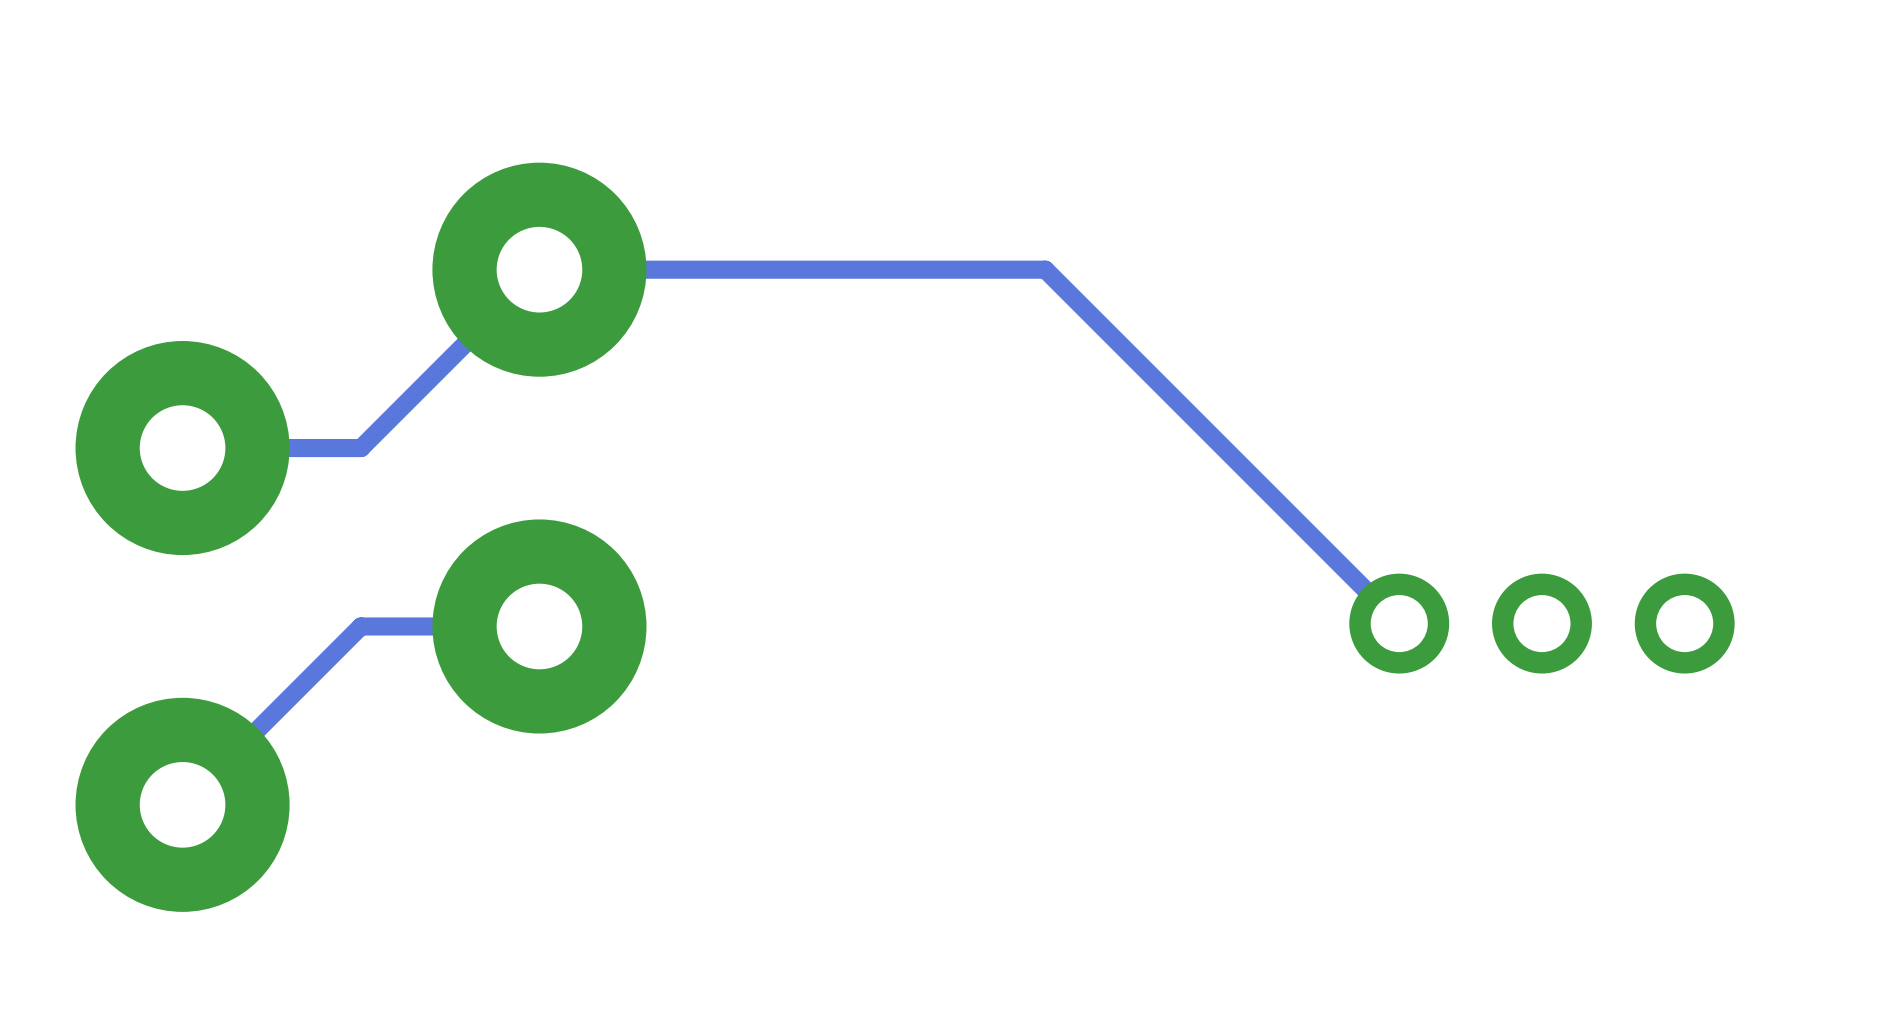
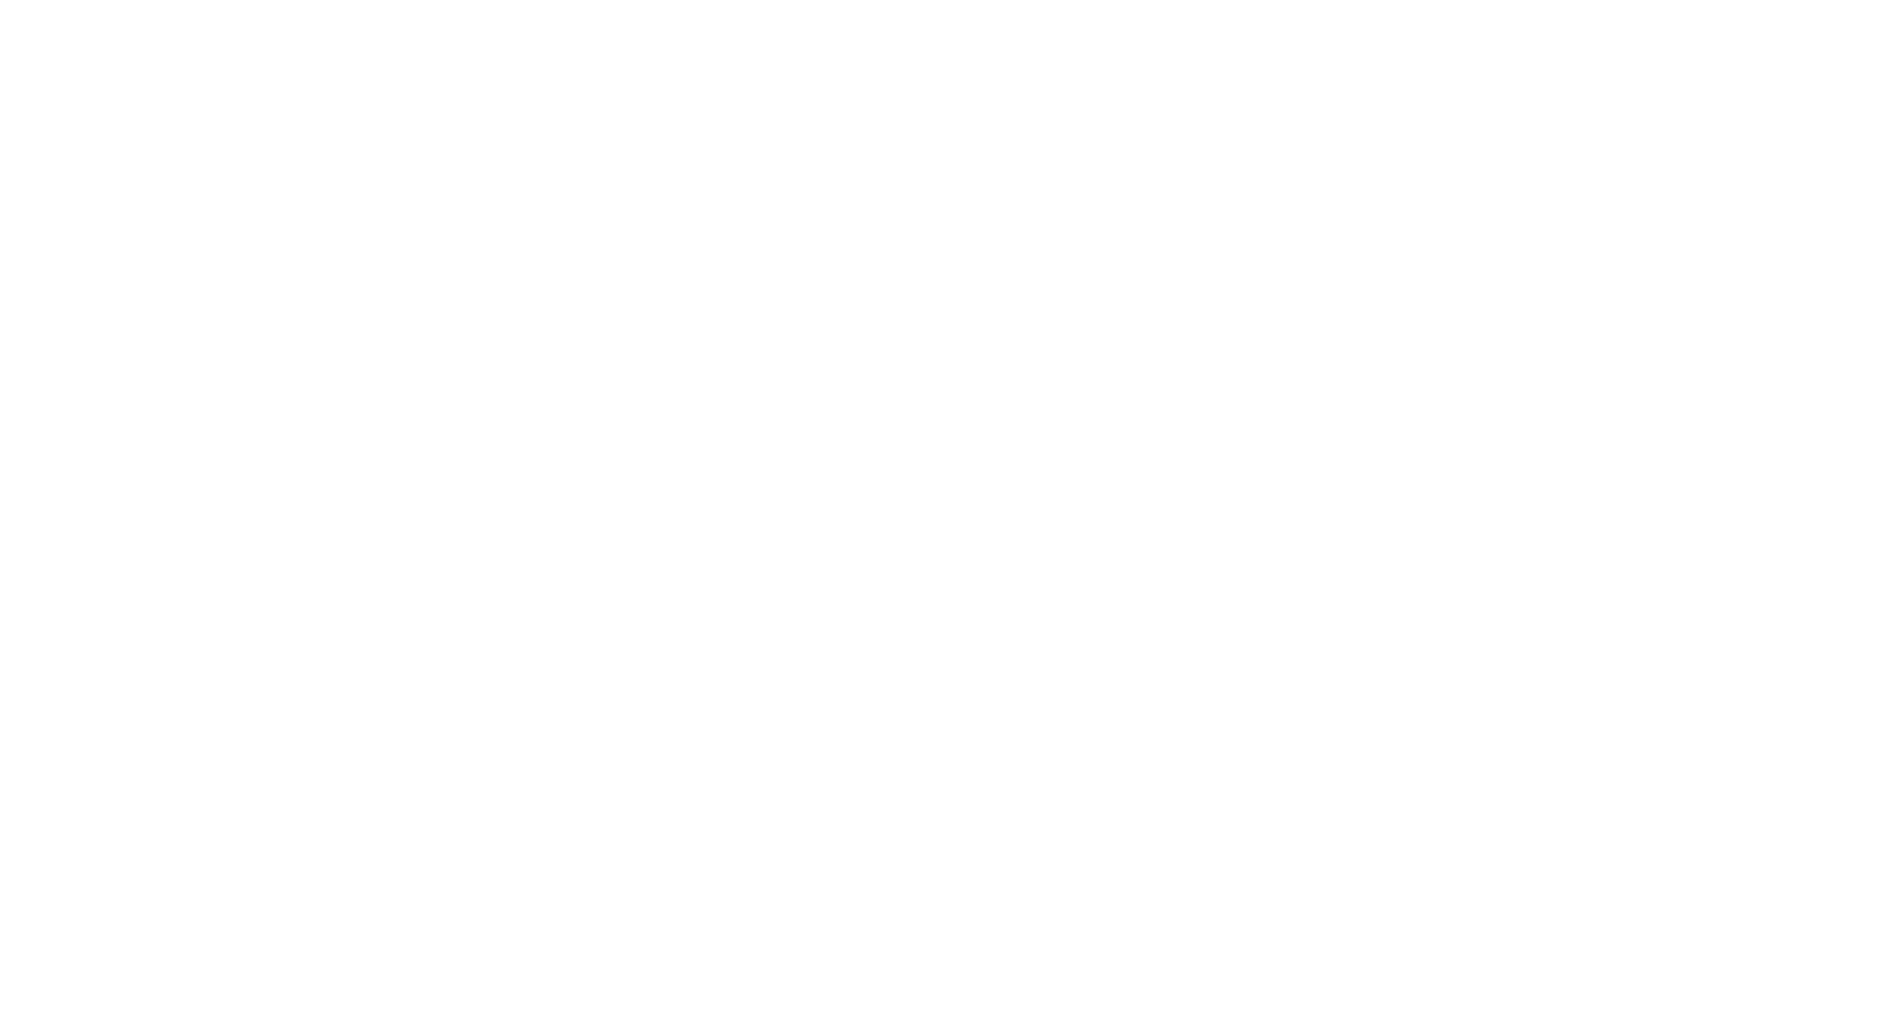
track: (182, 448) (361, 448) (539, 269) (1045, 269) (1399, 623) -> none
part: (361, 537) -> none
part: (1541, 623) -> none
track: (539, 626) (360, 626) (182, 804) -> none

